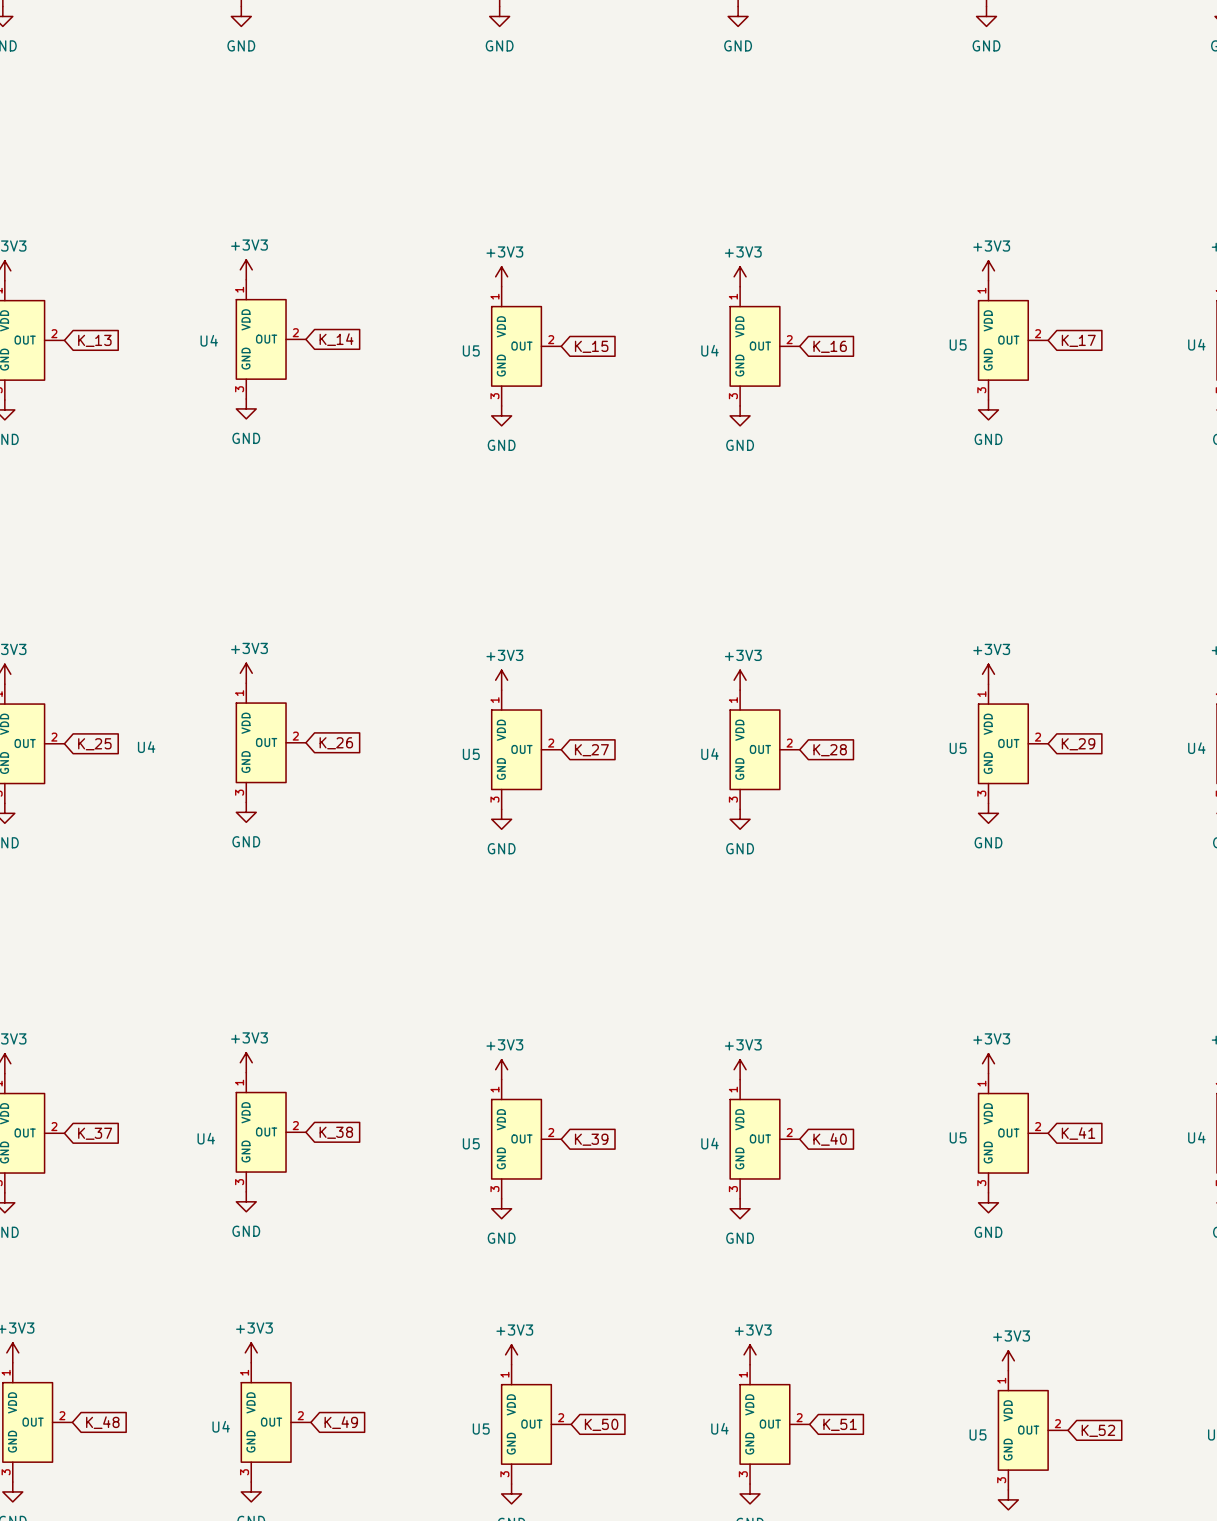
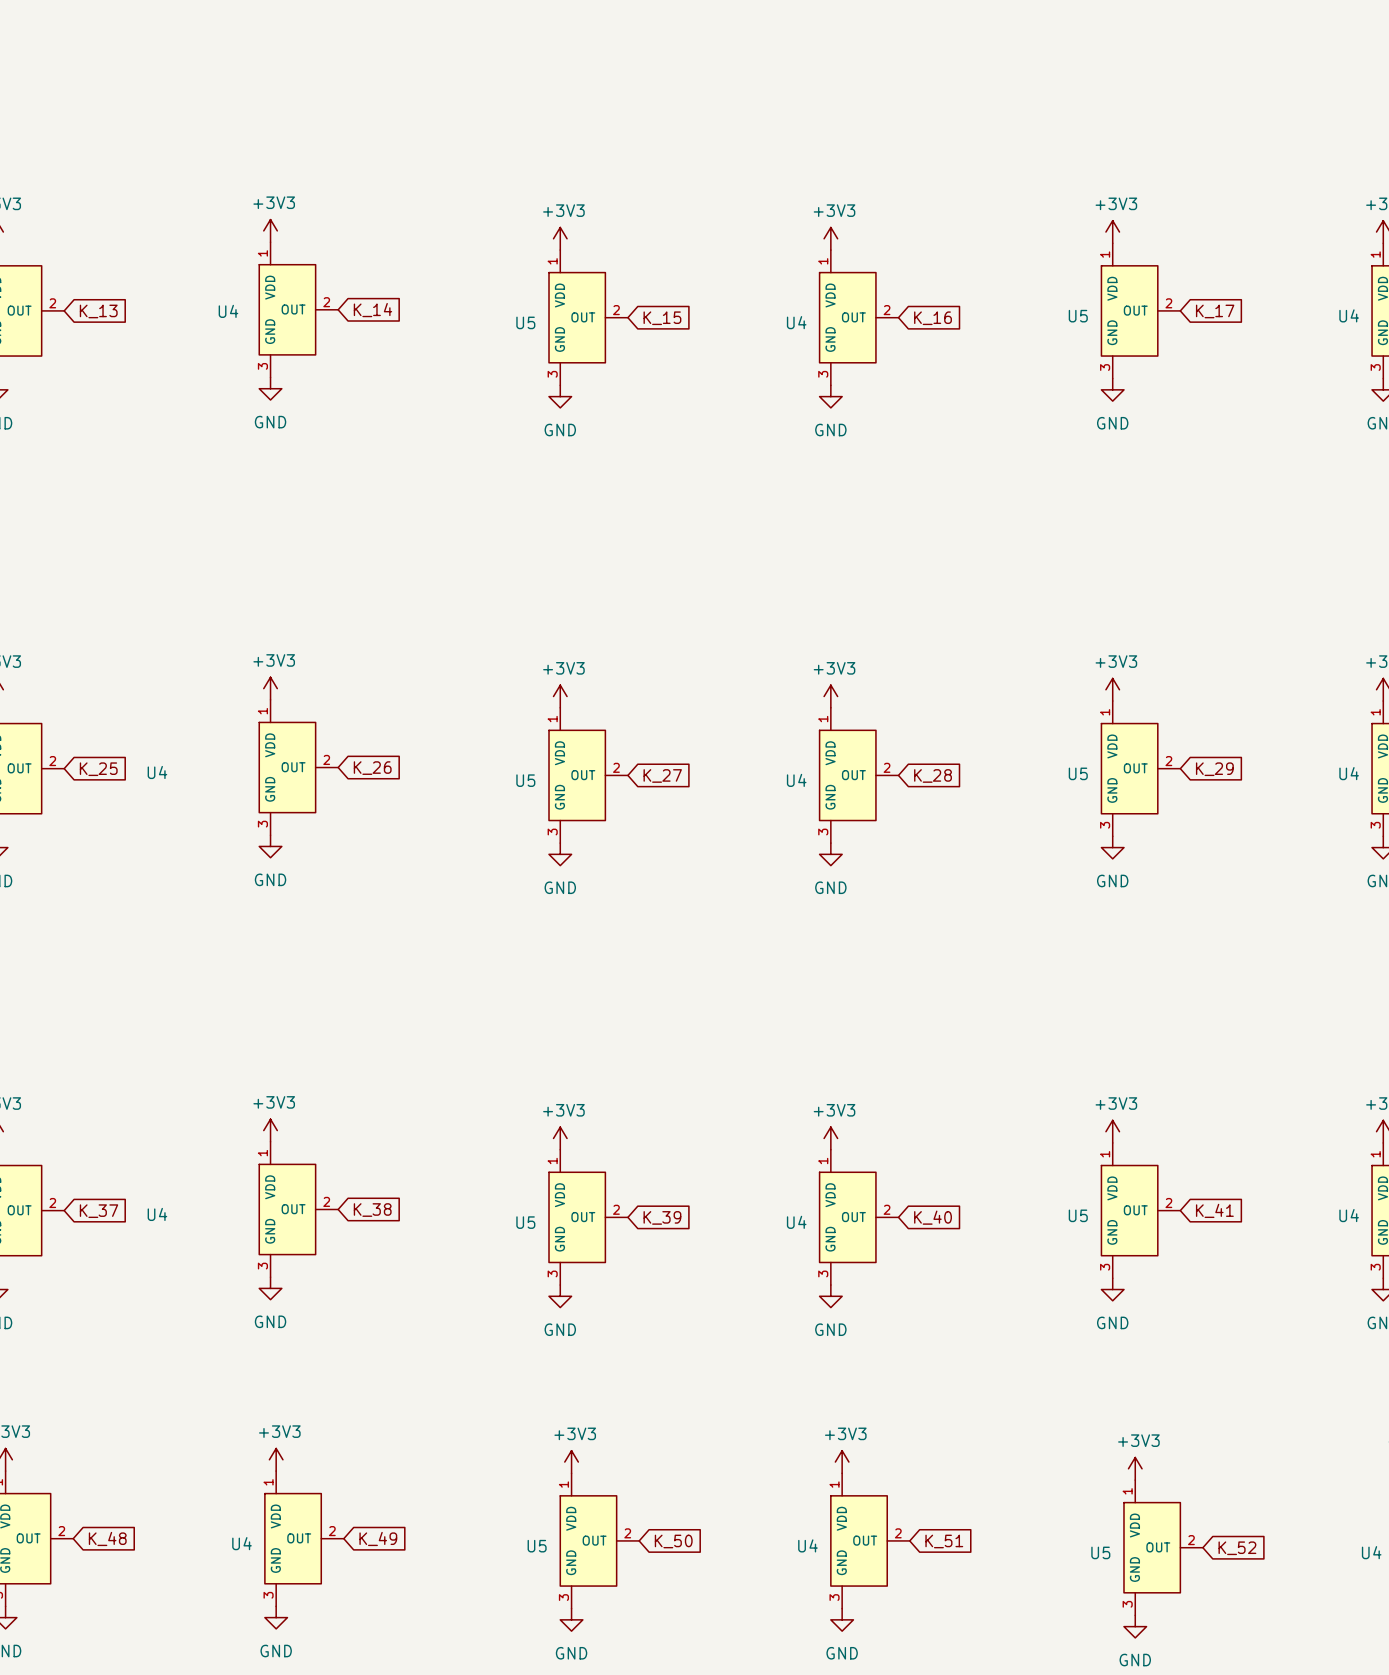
U4 name position: U4 (206, 1138) -> U4 (157, 1214)

